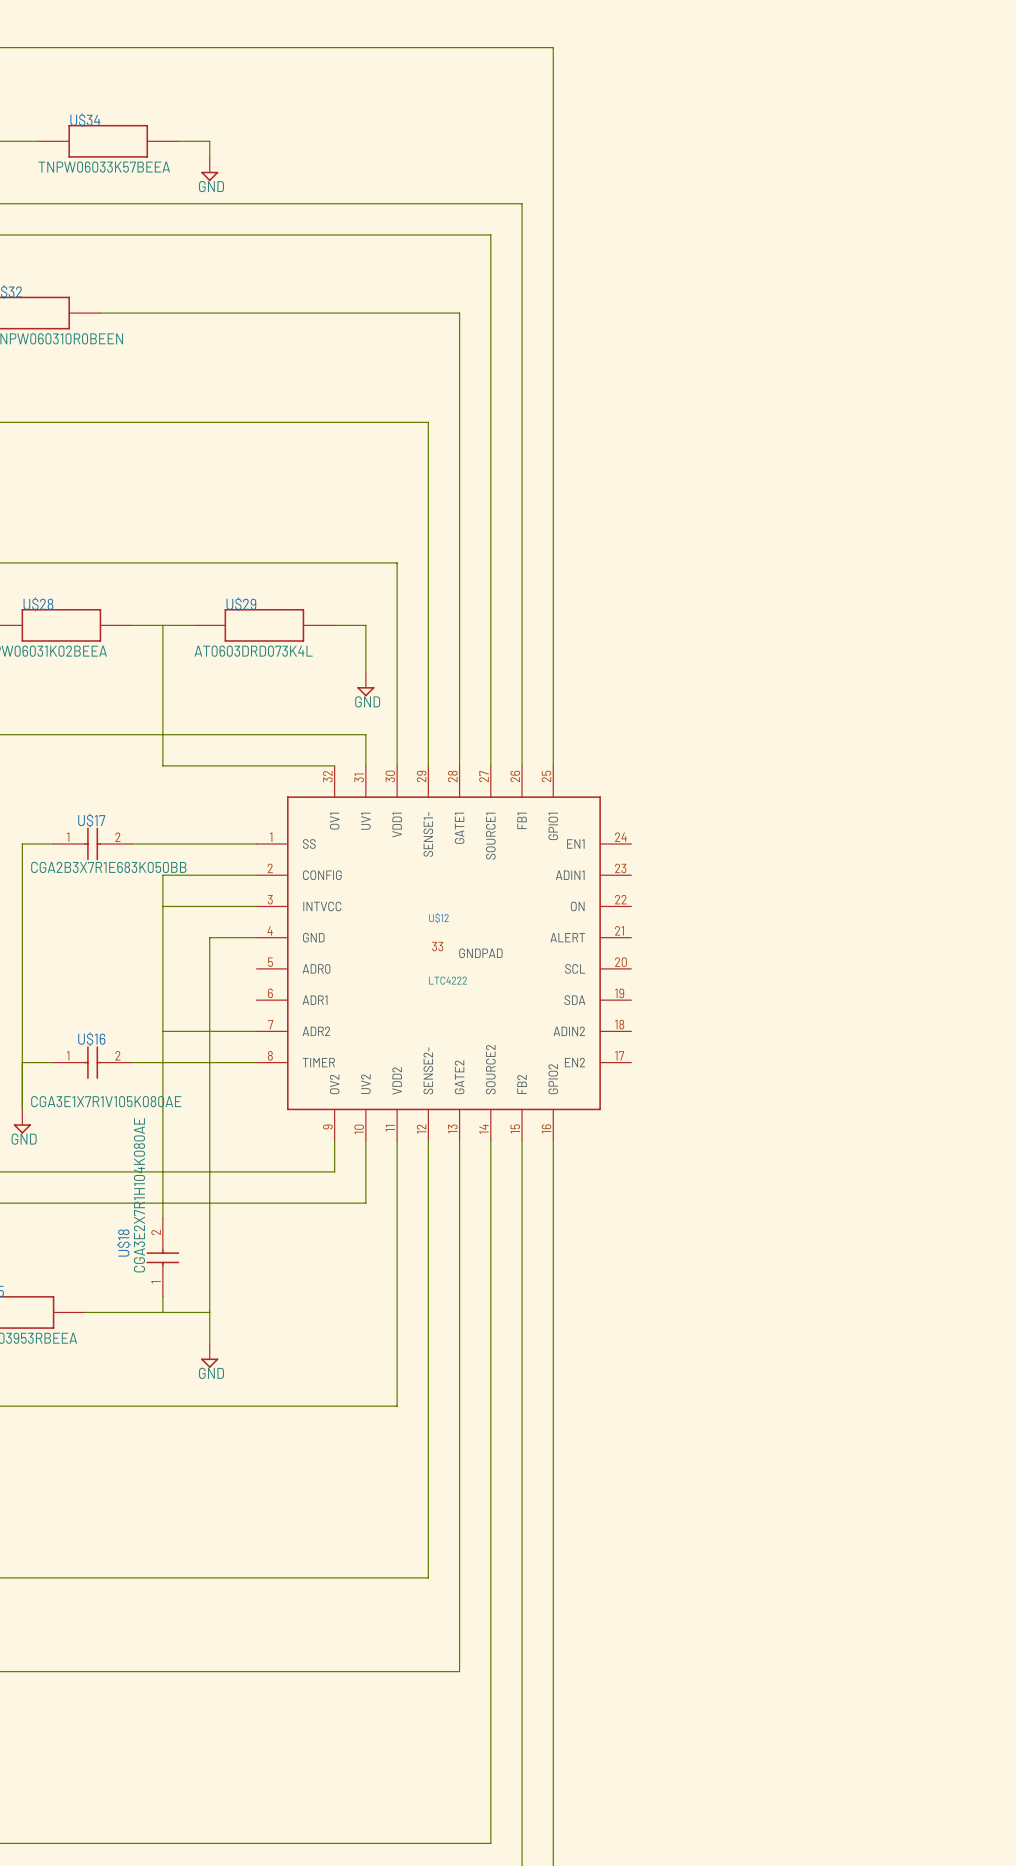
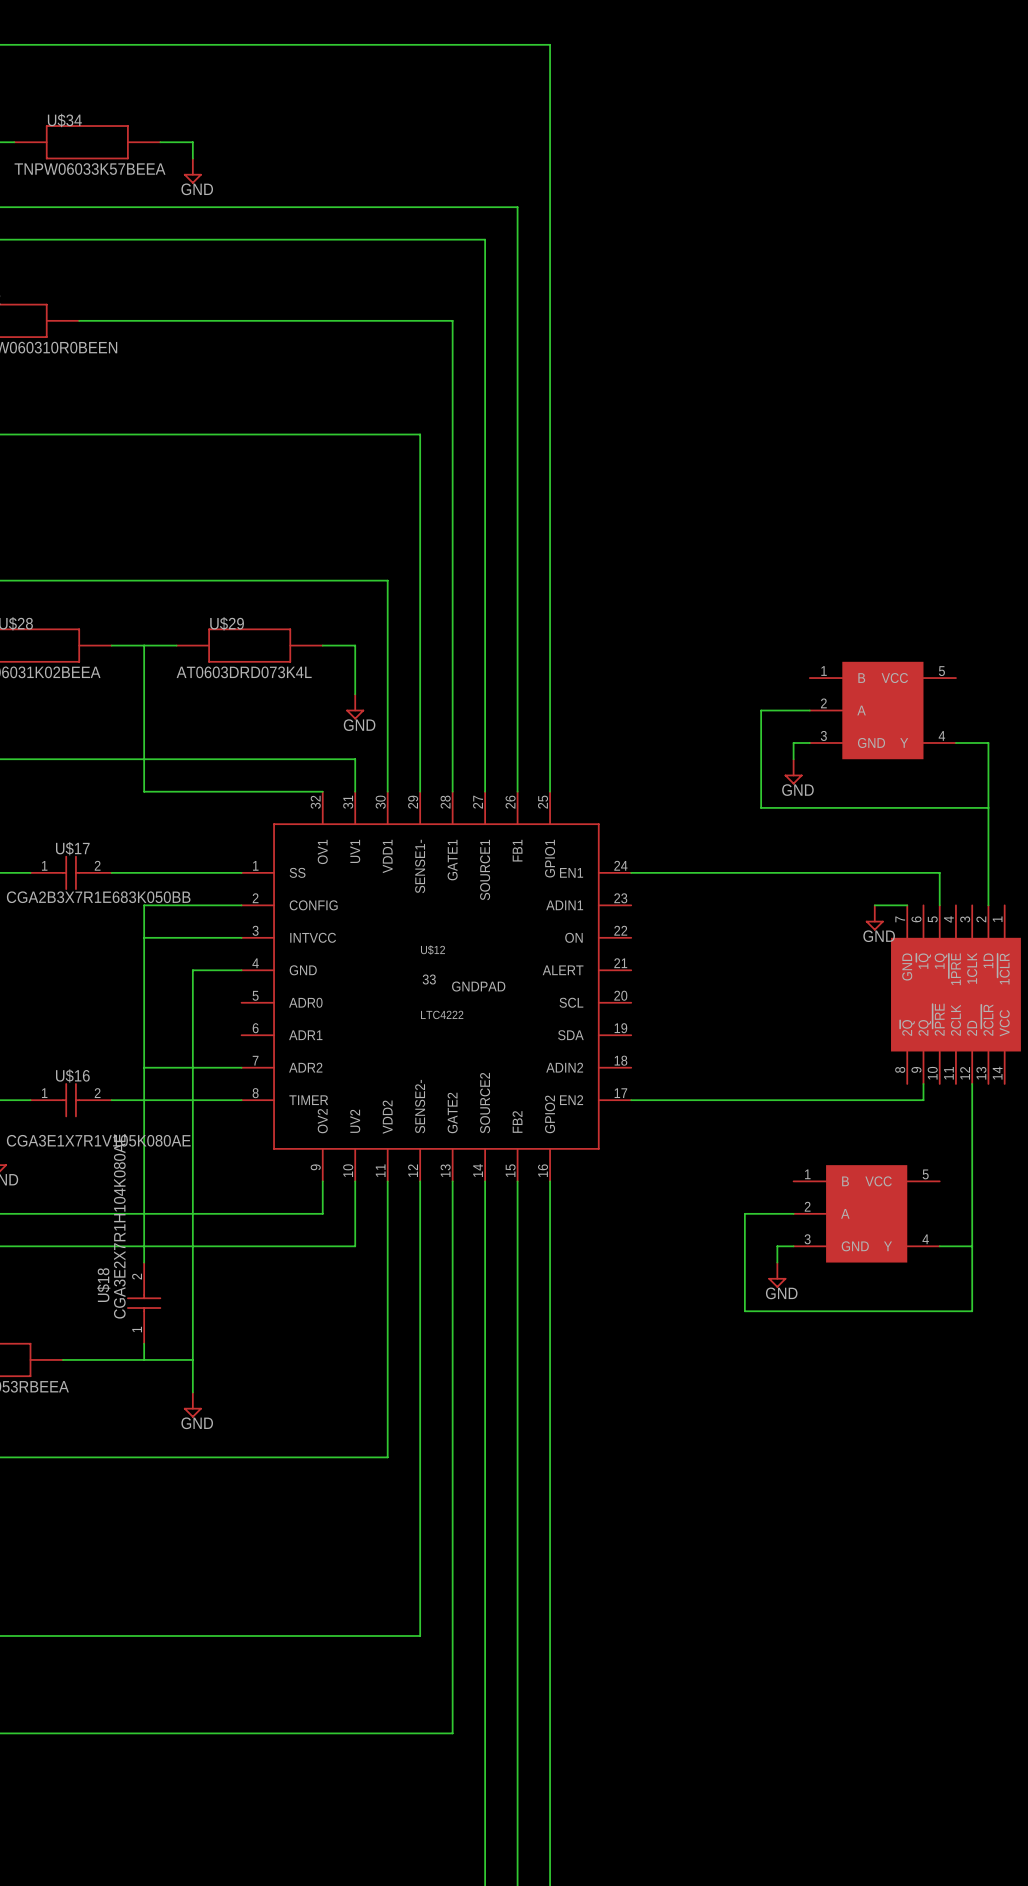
wire: none -> (809, 710) (761, 710) (761, 807) (988, 807)
part: none -> (882, 710)
wire: none -> (809, 742) (793, 742) (793, 759)
wire: none -> (955, 742) (988, 742) (988, 905)
power symbol: none -> GND (793, 771)
wire: none -> (631, 872) (939, 872) (939, 905)
wire: none -> (874, 905) (907, 905)
power symbol: none -> GND (874, 917)
part: none -> (955, 994)
wire: none -> (923, 1083) (923, 1100) (631, 1100)
wire: none -> (972, 1083) (972, 1311) (744, 1311) (744, 1213) (793, 1213)
part: none -> (866, 1213)
wire: none -> (793, 1246) (777, 1246) (777, 1262)
wire: none -> (939, 1246) (972, 1246)
power symbol: none -> GND (777, 1275)

